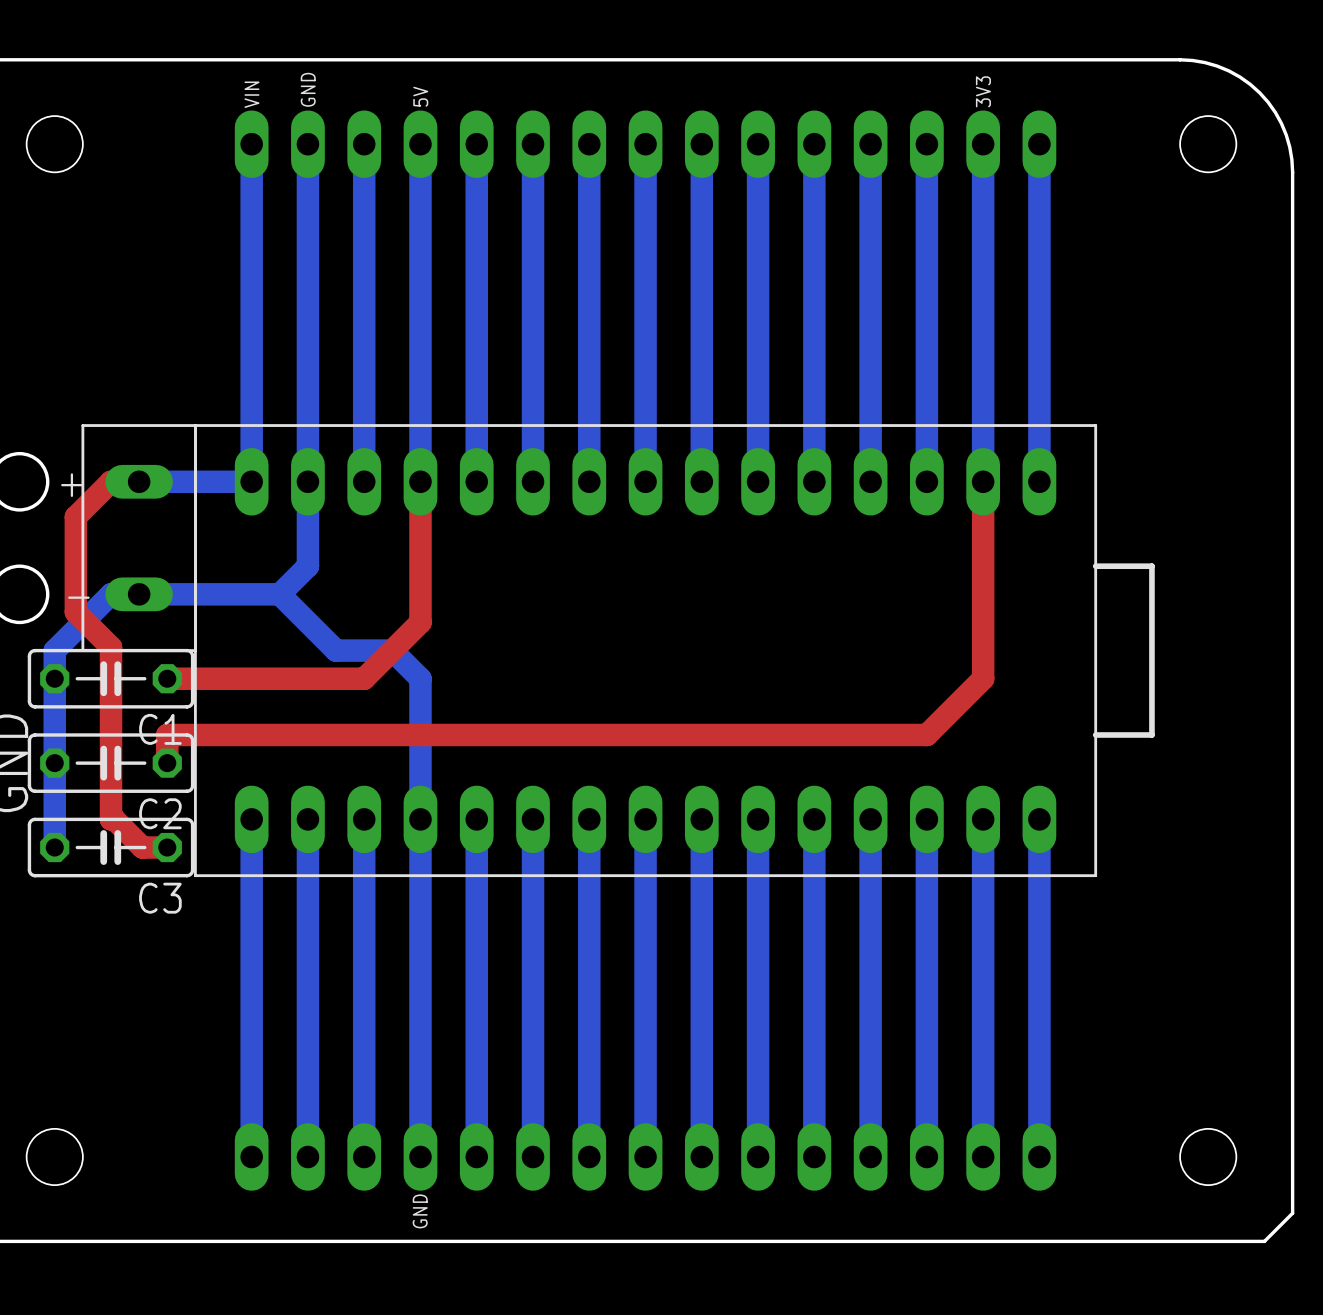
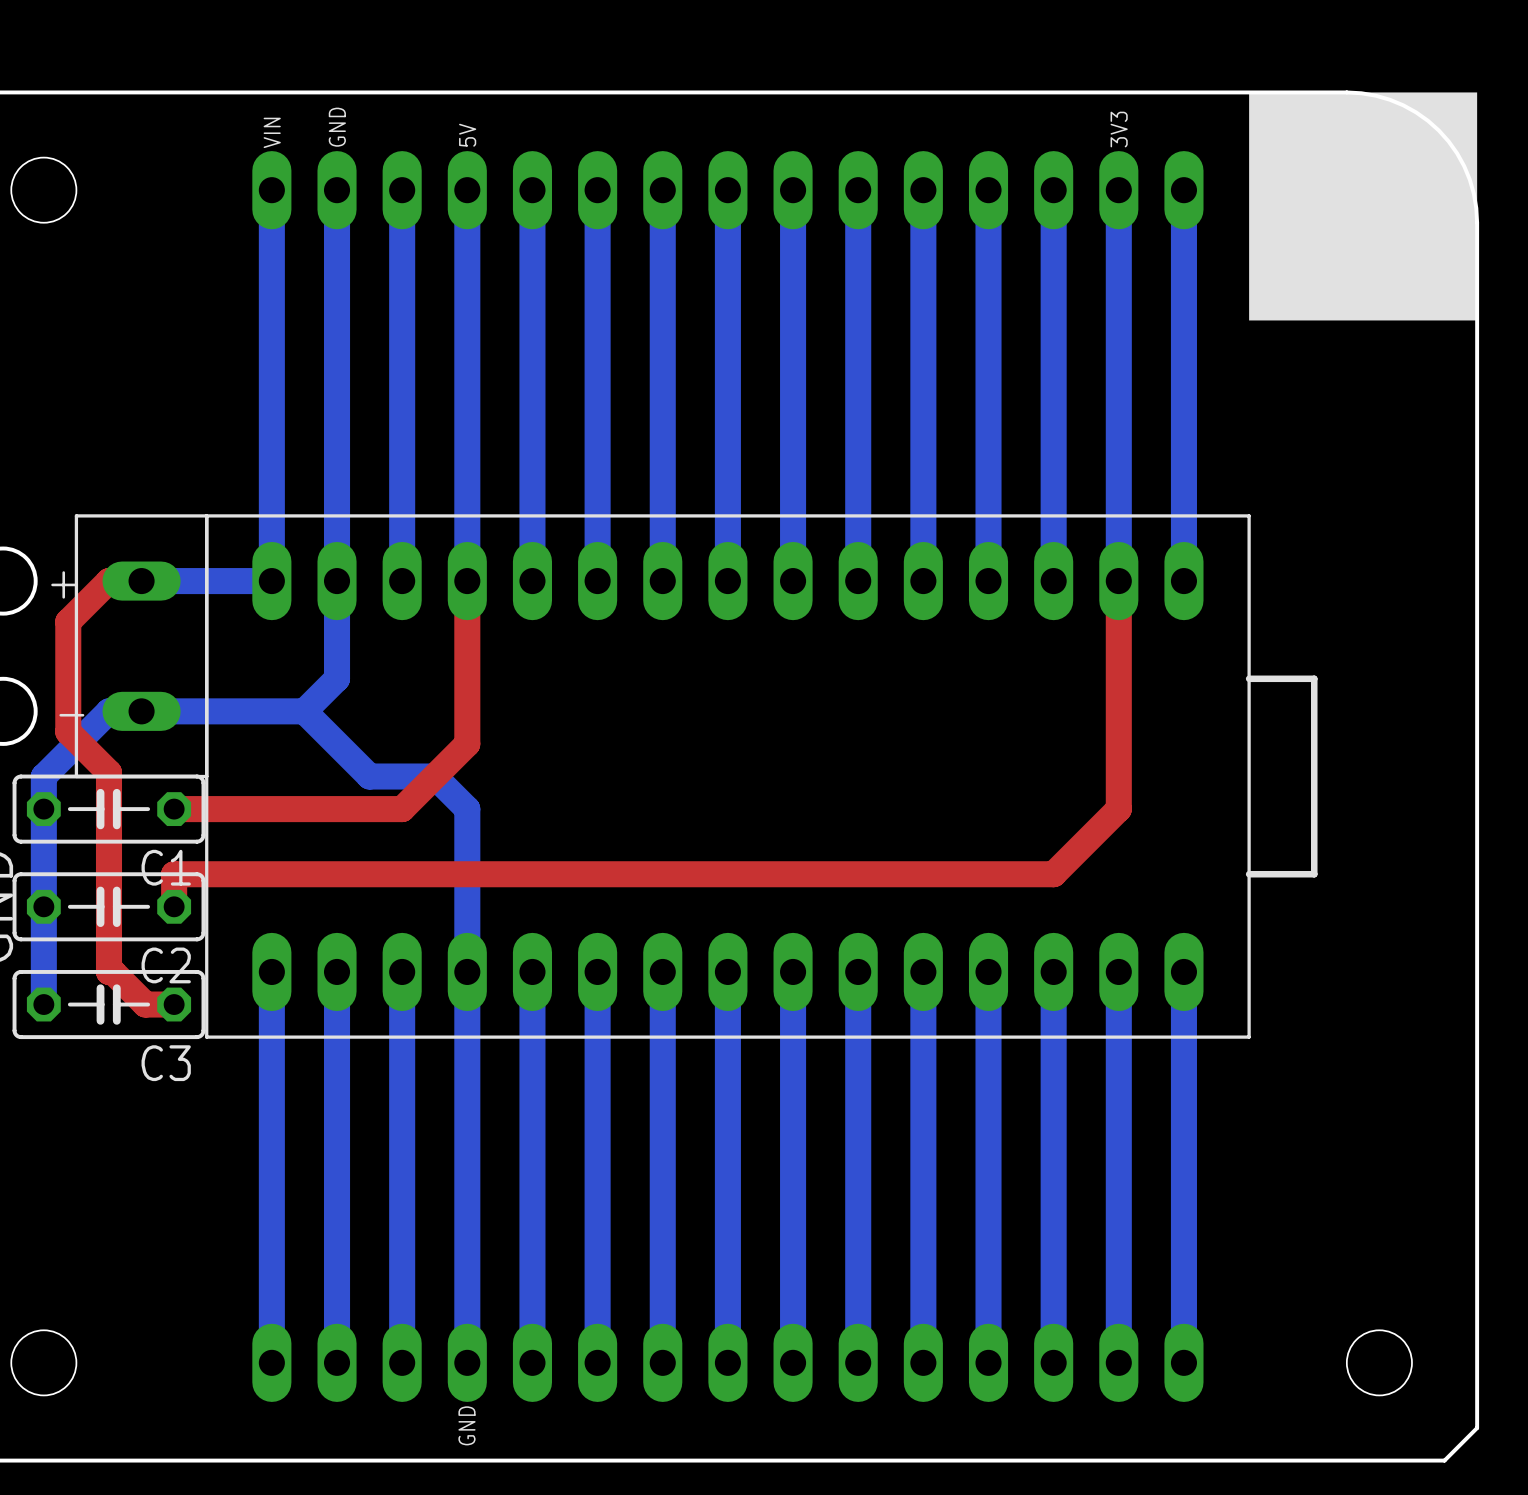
drawing: none -> [1249, 92, 1478, 321]

